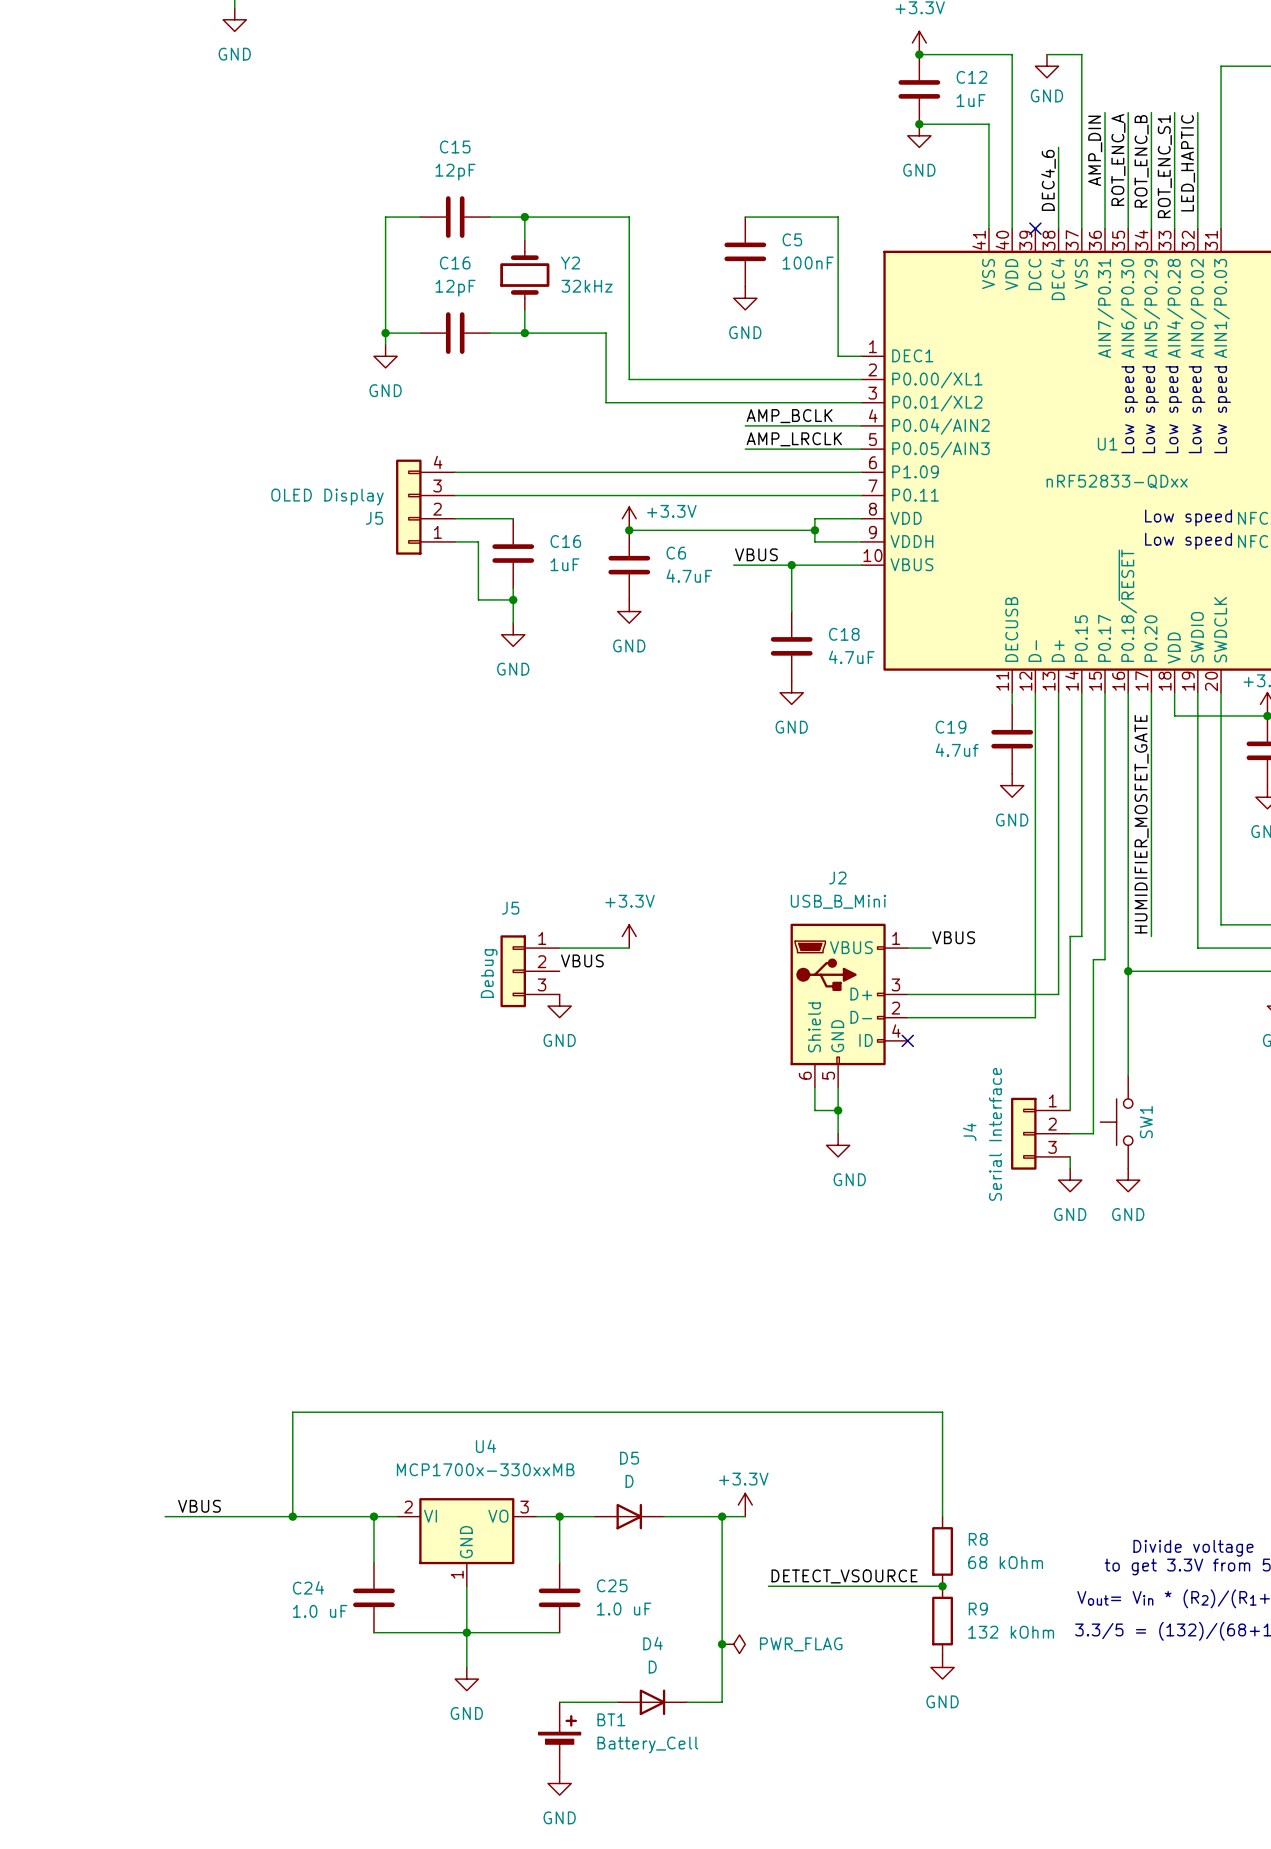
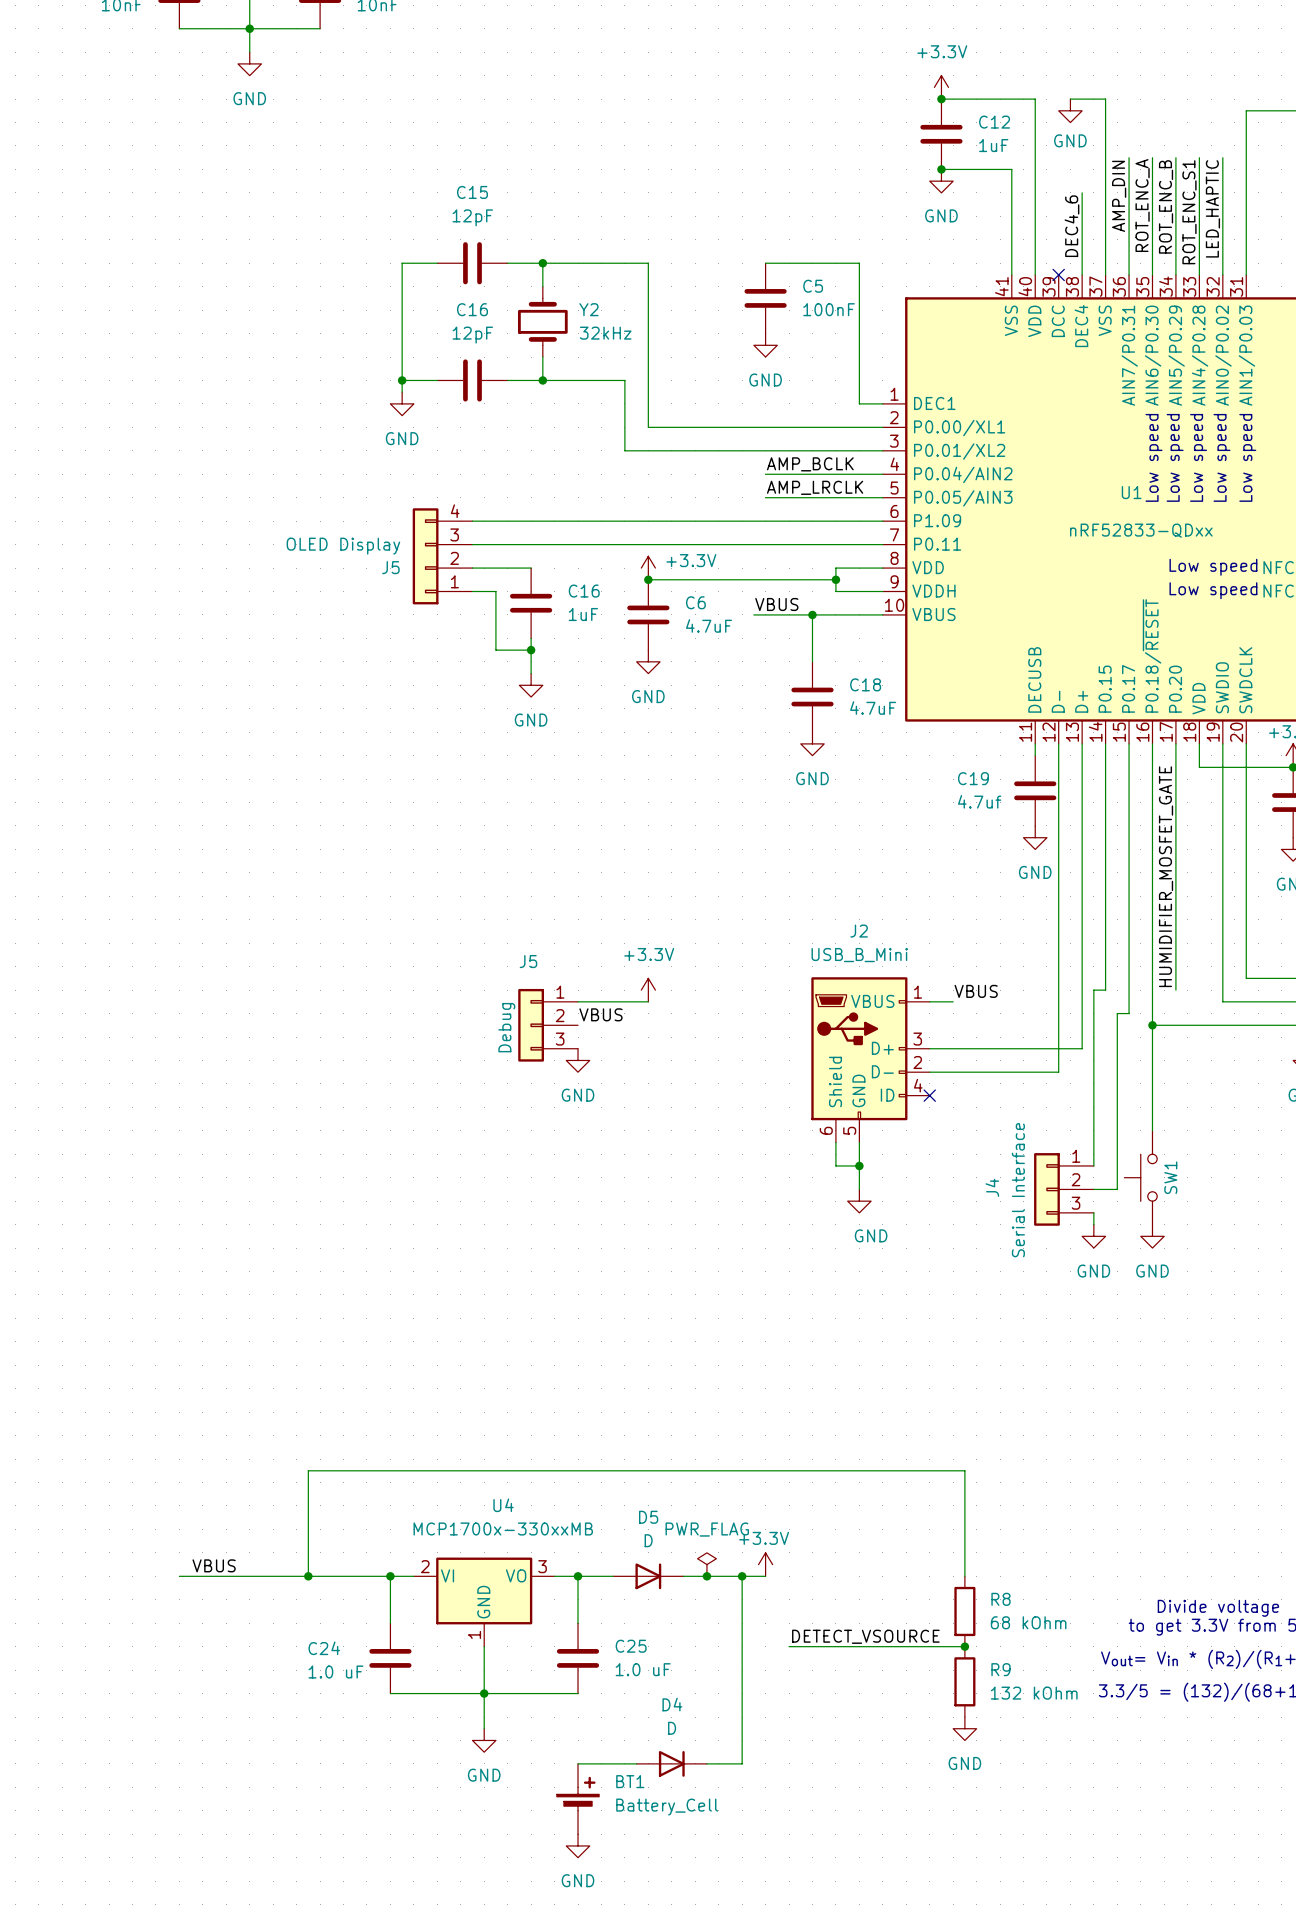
junction: none -> (706, 1576)
junction: (722, 1644) -> none
power symbol rotation: 0° (733, 1644) -> 90° counterclockwise (706, 1564)
power symbol position: PWR_FLAG (733, 1644) -> PWR_FLAG (706, 1564)
power symbol text position: PWR_FLAG (801, 1644) -> PWR_FLAG (707, 1529)

